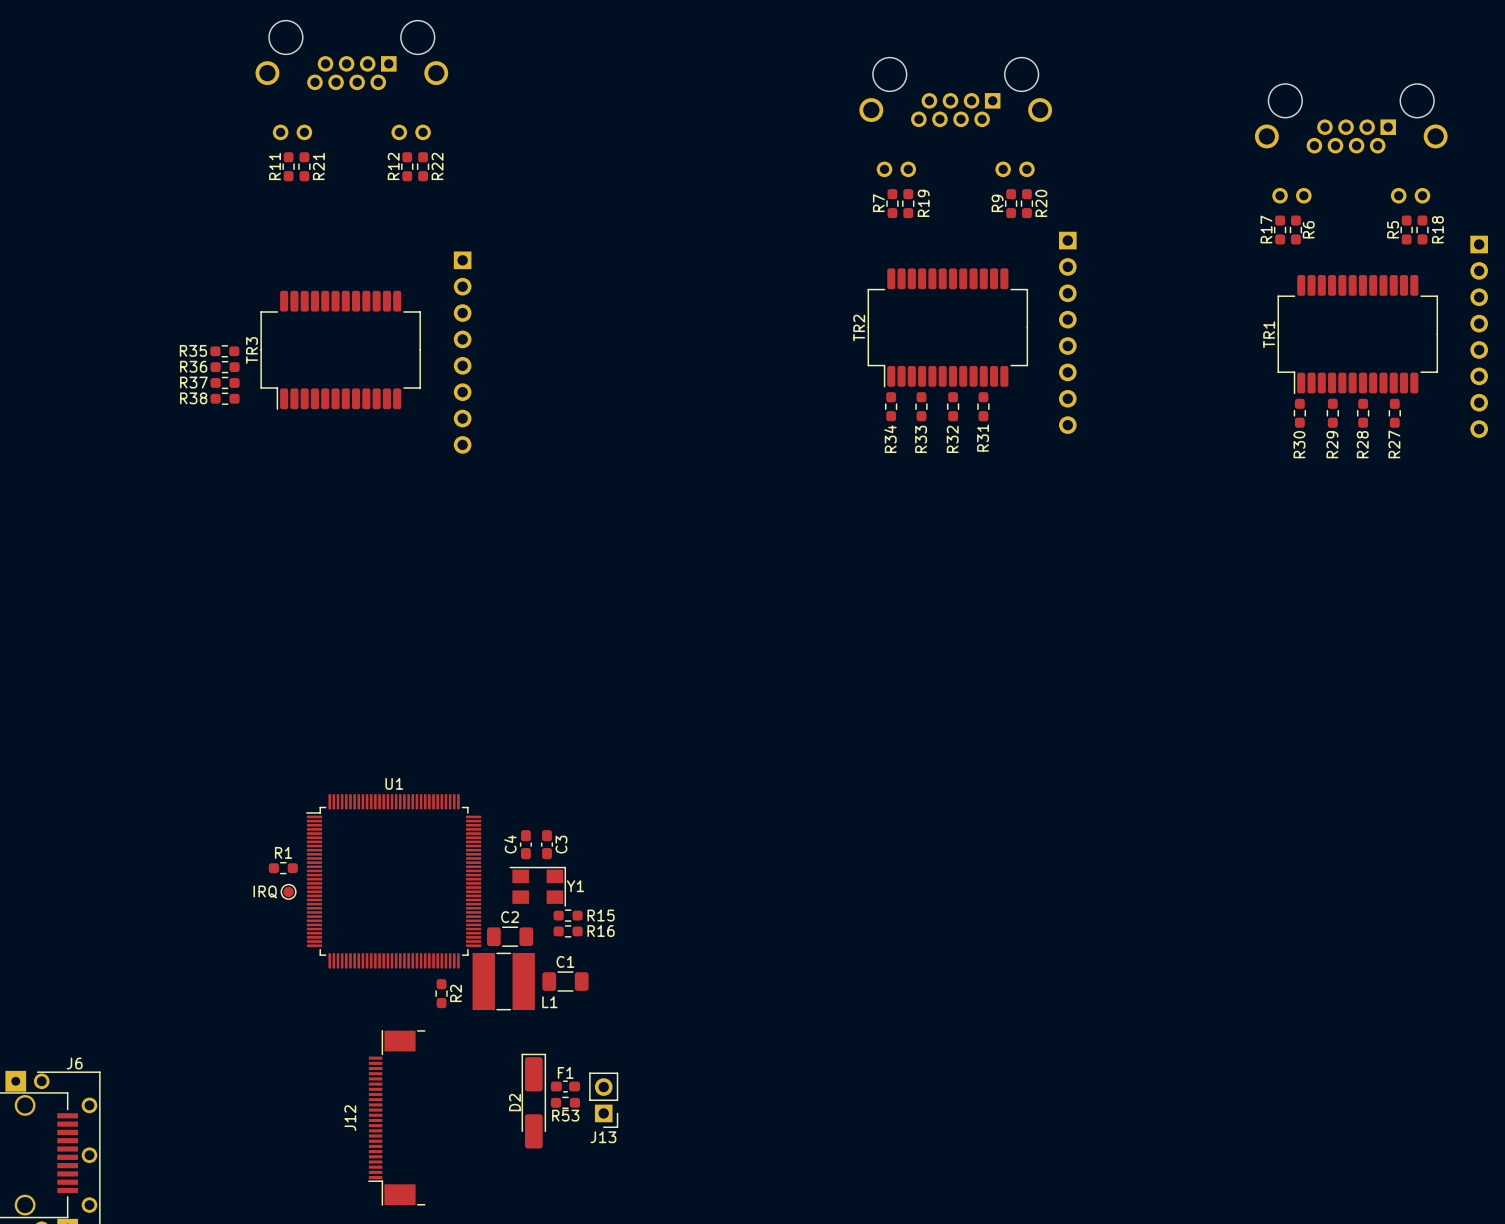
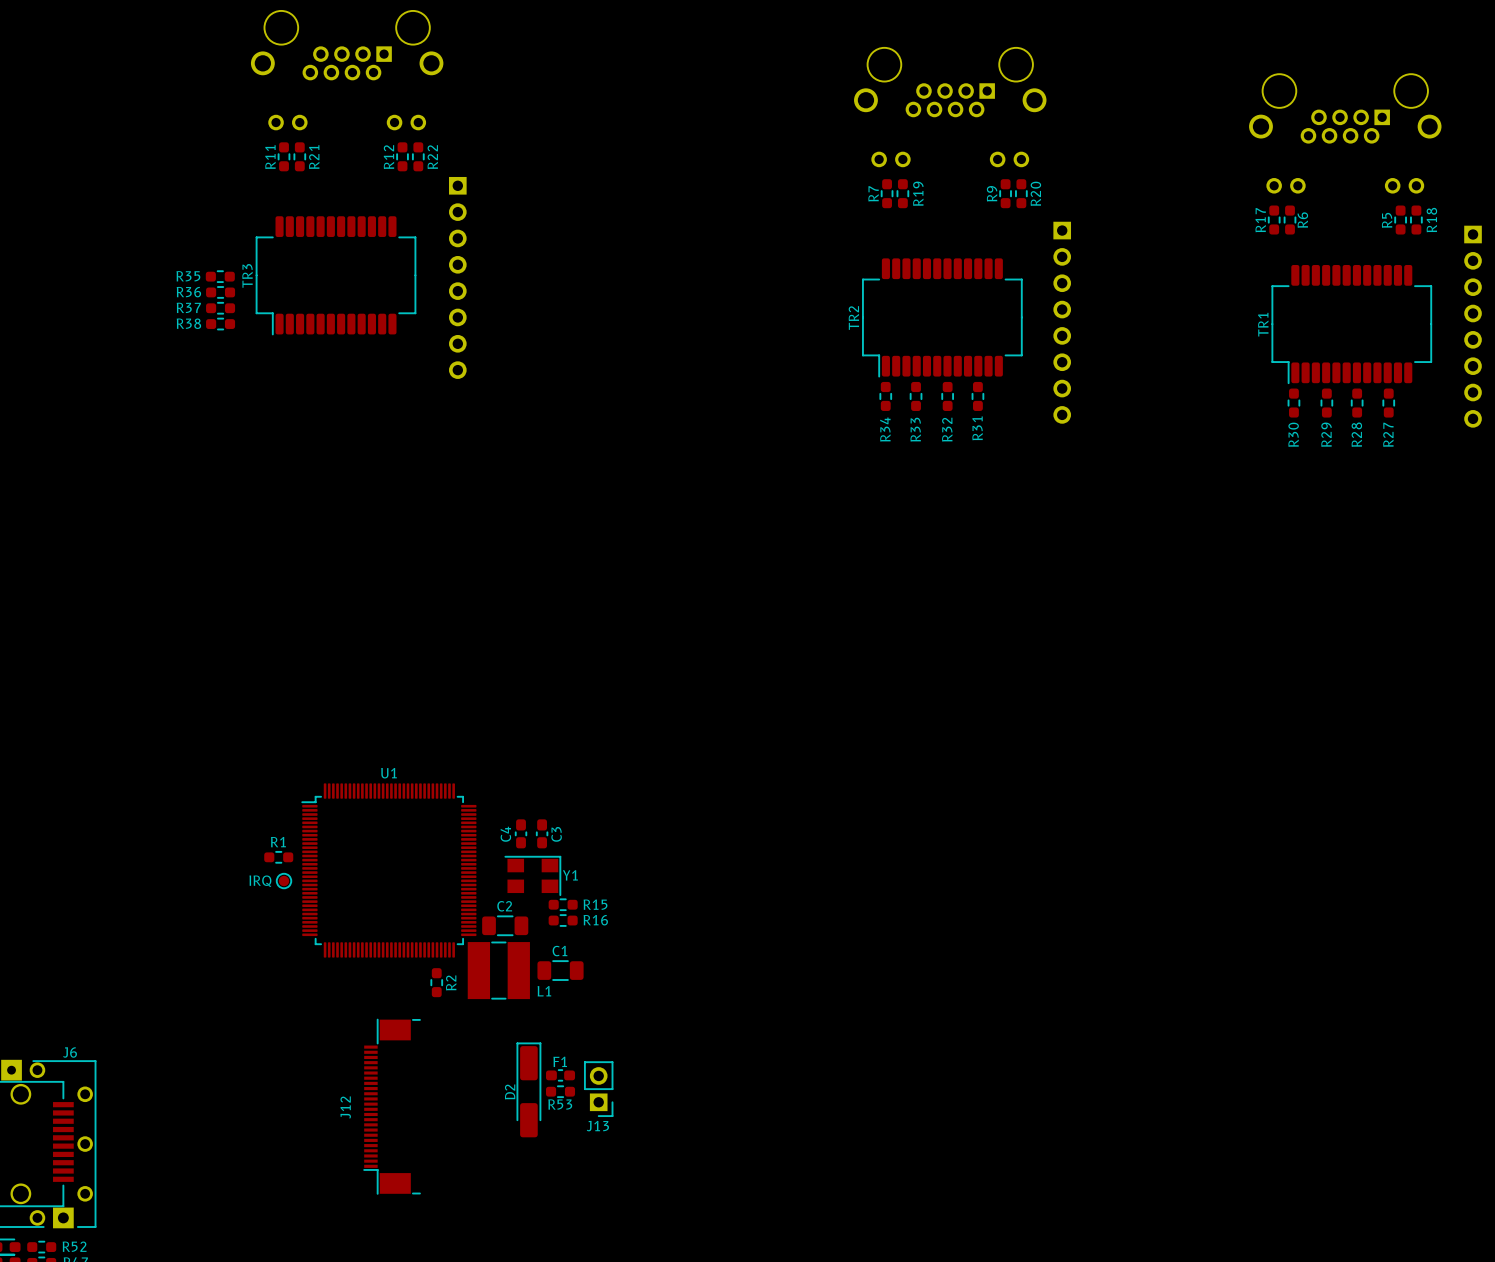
TR3 position: (340, 350) -> (336, 275)
R35 position: (224, 351) -> (220, 276)
part position: (462, 352) -> (457, 277)
R36 position: (225, 367) -> (220, 292)
R37 position: (225, 382) -> (220, 308)
R38 position: (225, 398) -> (220, 324)

